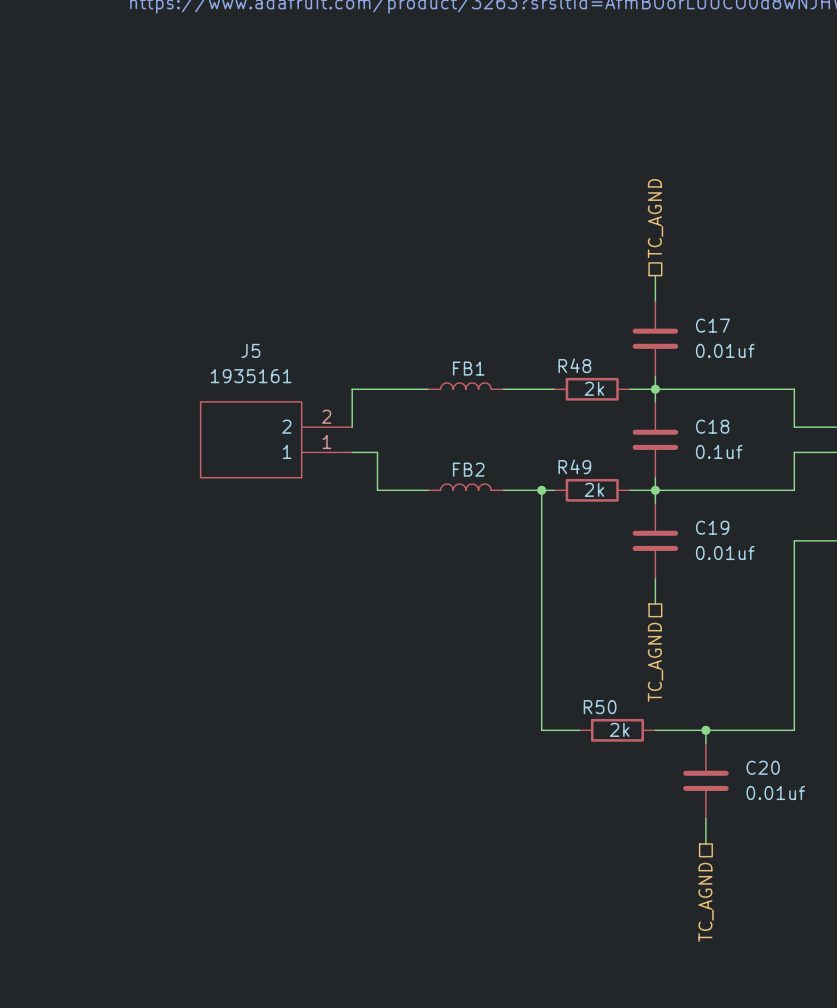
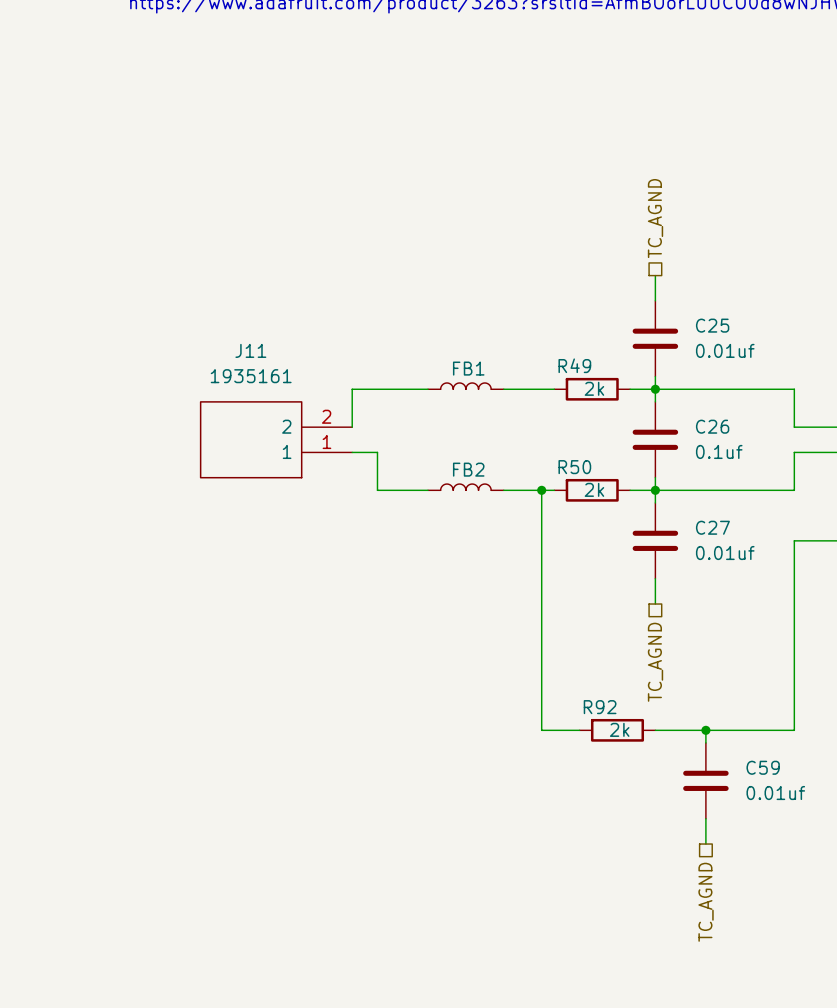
C17 name: C17 (712, 325) -> C25 (712, 325)
J5 name: J5 (250, 350) -> J11 (250, 350)
R48 name: R48 (574, 365) -> R49 (574, 365)
C18 name: C18 (712, 426) -> C26 (712, 426)
R49 name: R49 (574, 466) -> R50 (574, 467)
C19 name: C19 (712, 527) -> C27 (712, 527)
R50 name: R50 (600, 707) -> R92 (600, 707)
C20 name: C20 (763, 767) -> C59 (763, 767)

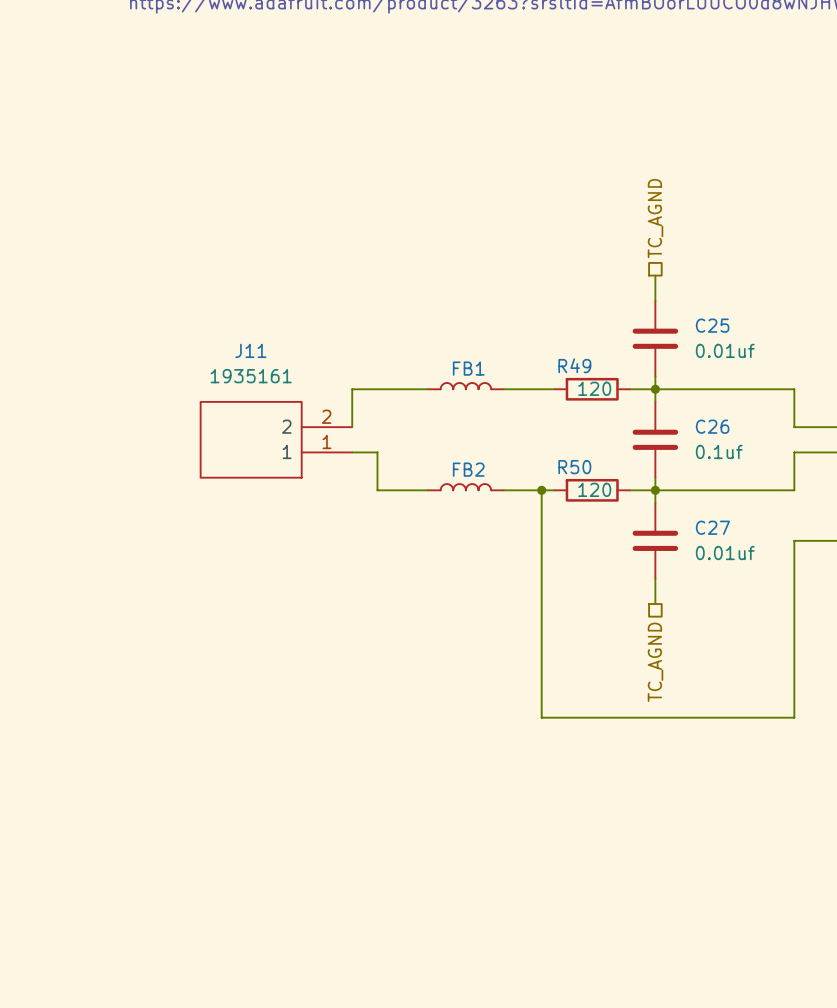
R49 value: 2k (594, 388) -> 120 (594, 388)
R50 value: 2k (594, 489) -> 120 (594, 489)
wire: (541, 717) (541, 730) (579, 730) -> none
wire: (794, 717) (794, 730) (655, 730) -> (794, 717) (541, 717)
R92: 2k (617, 730) -> none
wire: (705, 730) (705, 742) -> none
junction: (705, 730) -> none
C59: 0.01uf (705, 780) -> none
wire: (705, 818) (705, 844) -> none
hierarchical label: TC_AGND (706, 902) -> none

